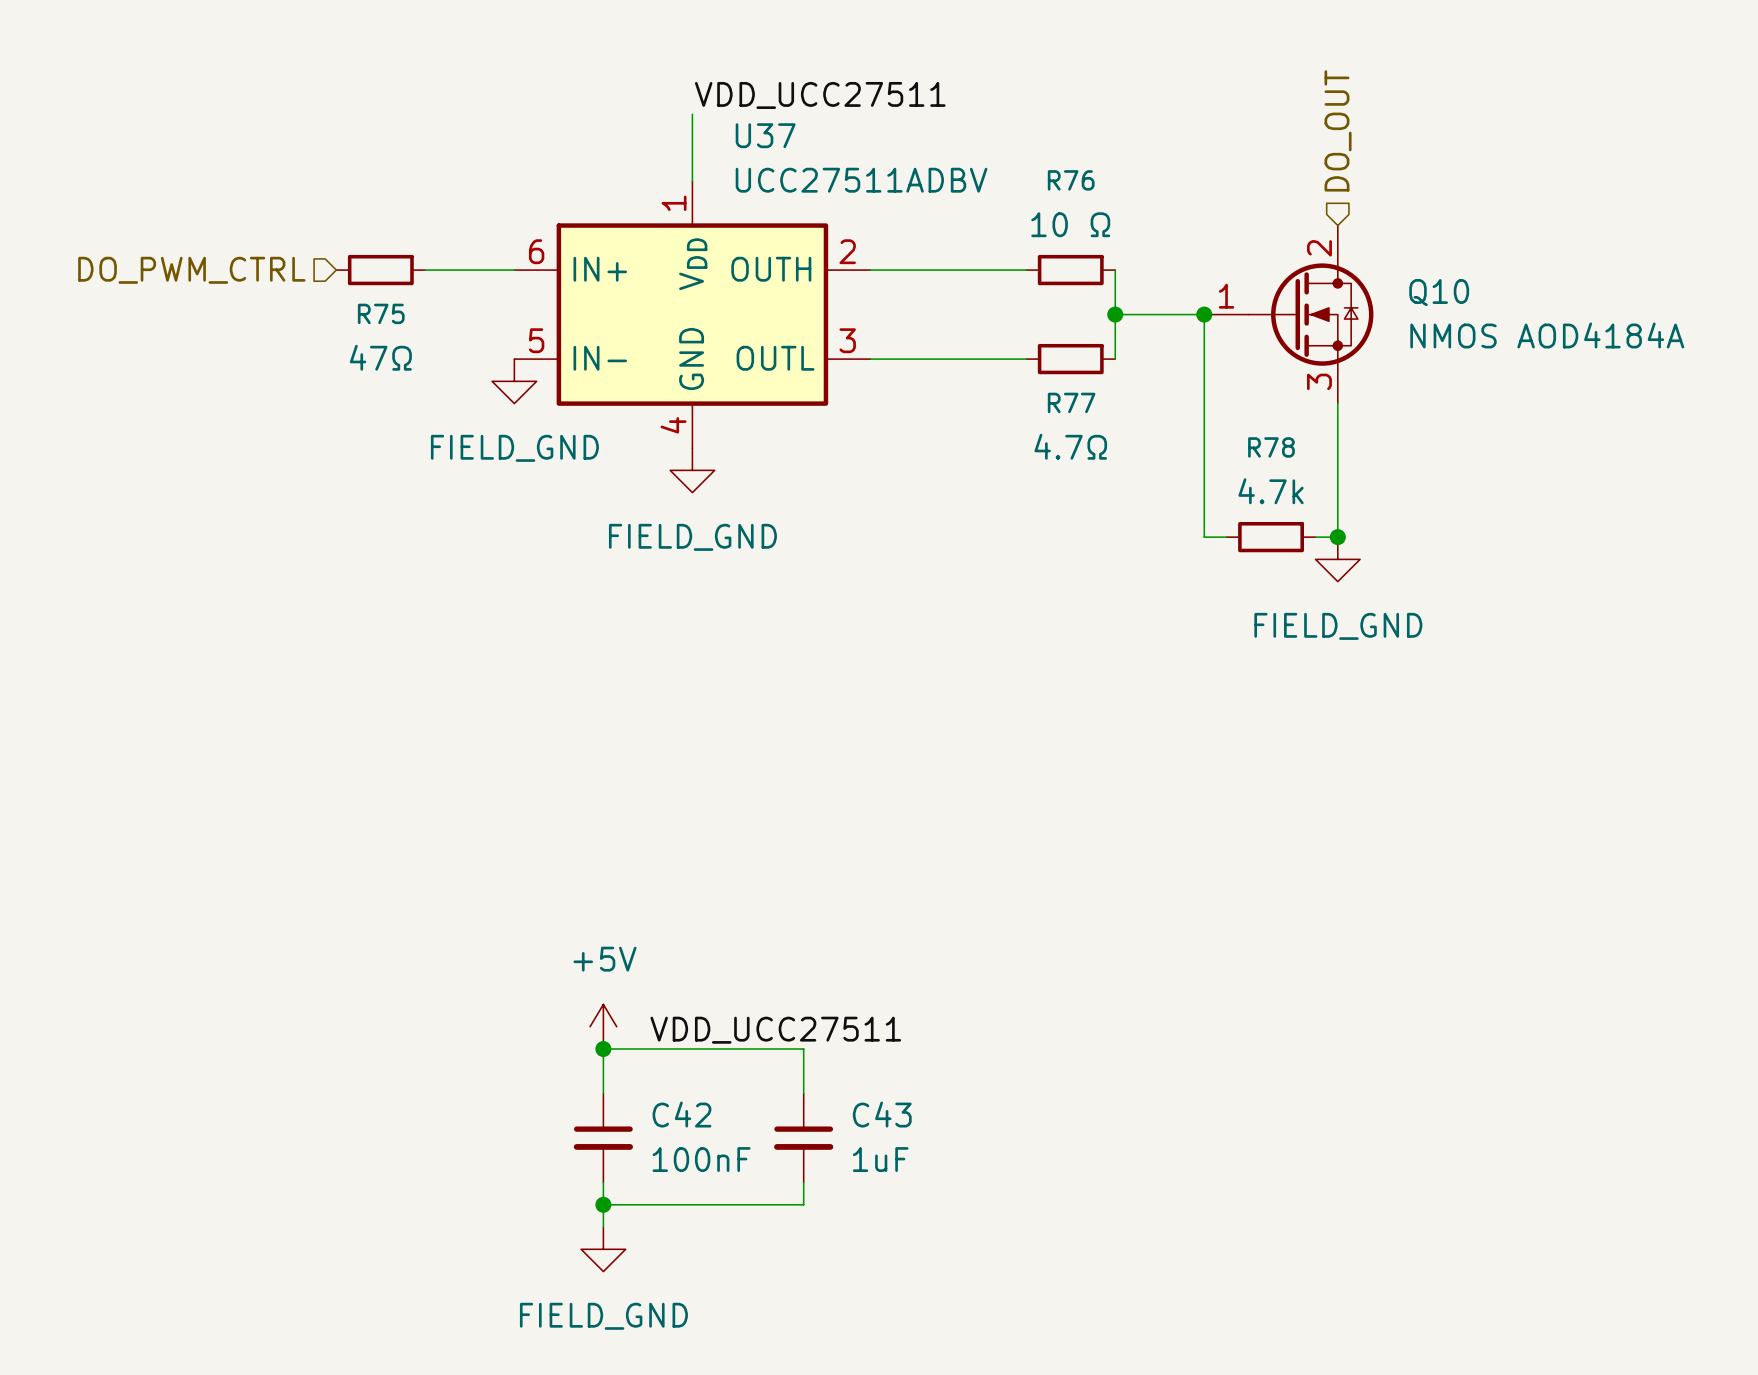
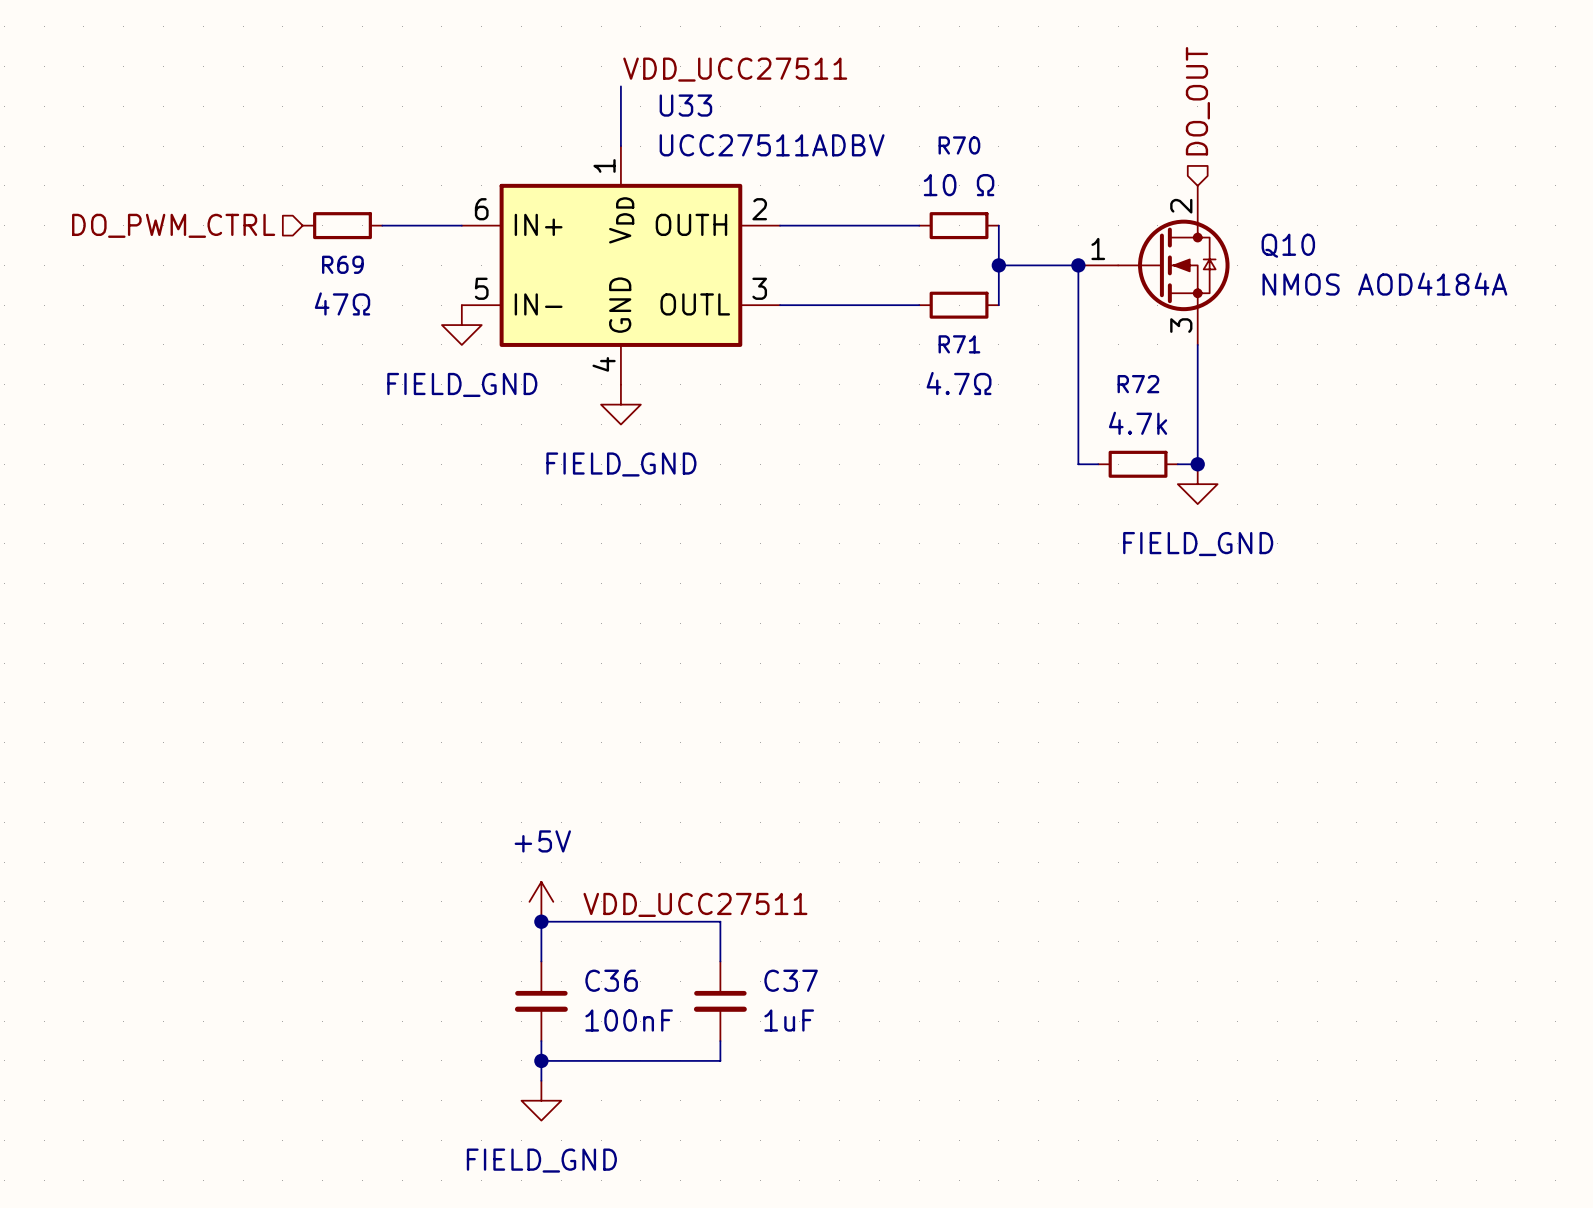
U37 name: U37 (765, 135) -> U33 (685, 105)
R76 name: R76 (1071, 180) -> R70 (959, 145)
R75 name: R75 (381, 313) -> R69 (342, 264)
R77 name: R77 (1071, 402) -> R71 (959, 344)
R78 name: R78 (1271, 447) -> R72 (1138, 384)
C42 name: C42 (681, 1114) -> C36 (611, 980)
C43 name: C43 (882, 1114) -> C37 (791, 980)

